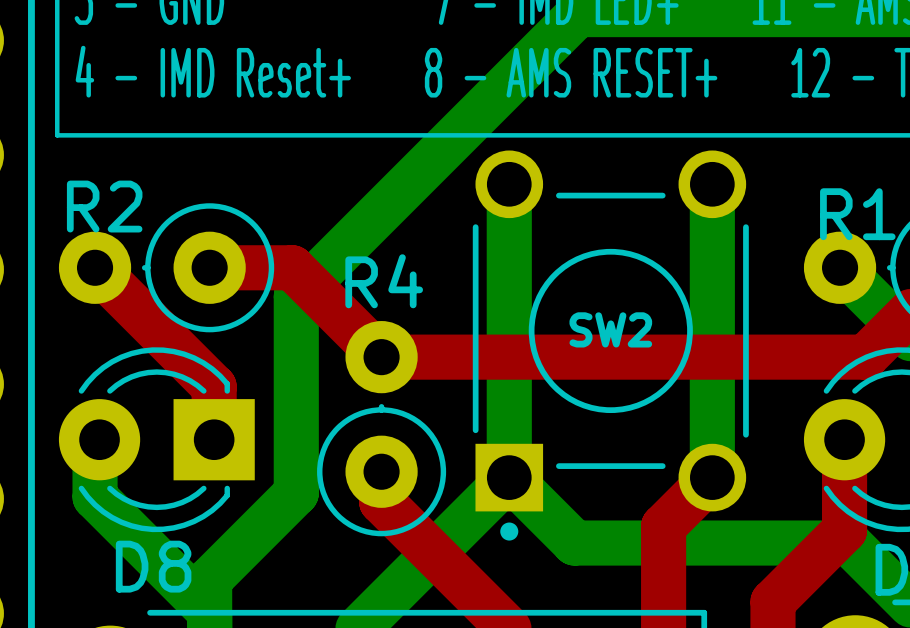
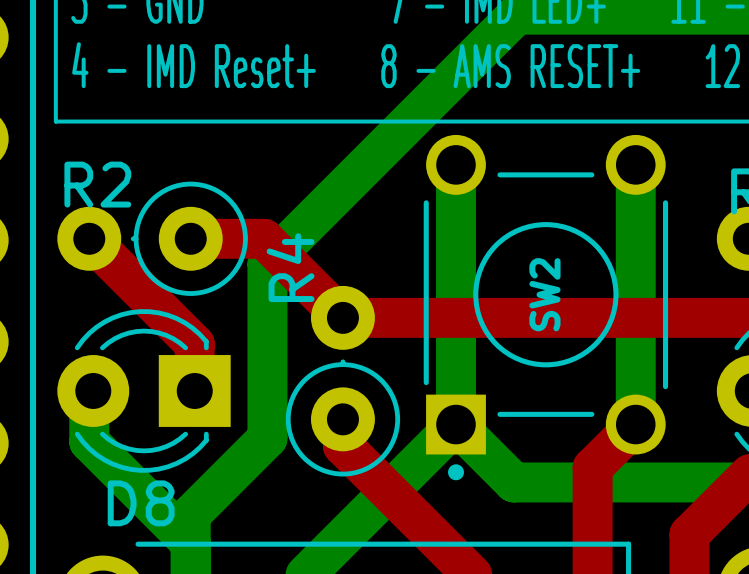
R4 name rotation: 0° (384, 281) -> 90° counterclockwise (290, 267)
SW2 name rotation: 0° (610, 329) -> 90° counterclockwise (544, 294)

